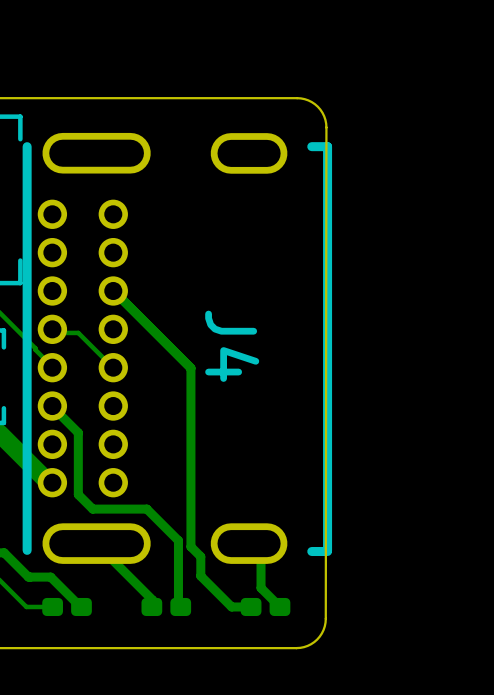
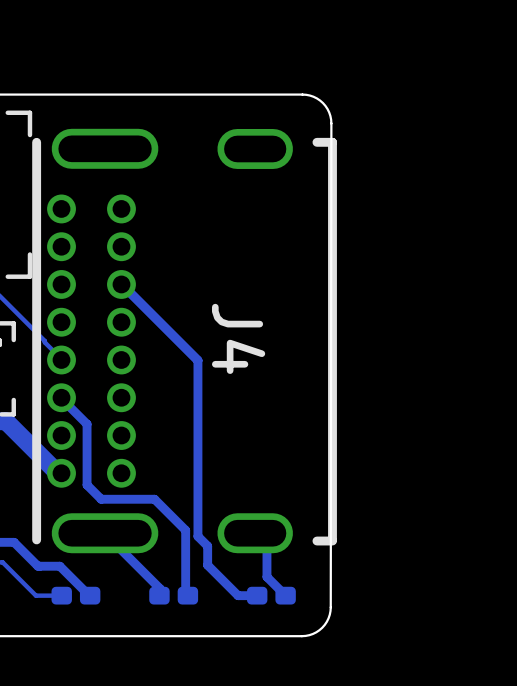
track: (55, 332) (78, 332) (114, 369) -> none

